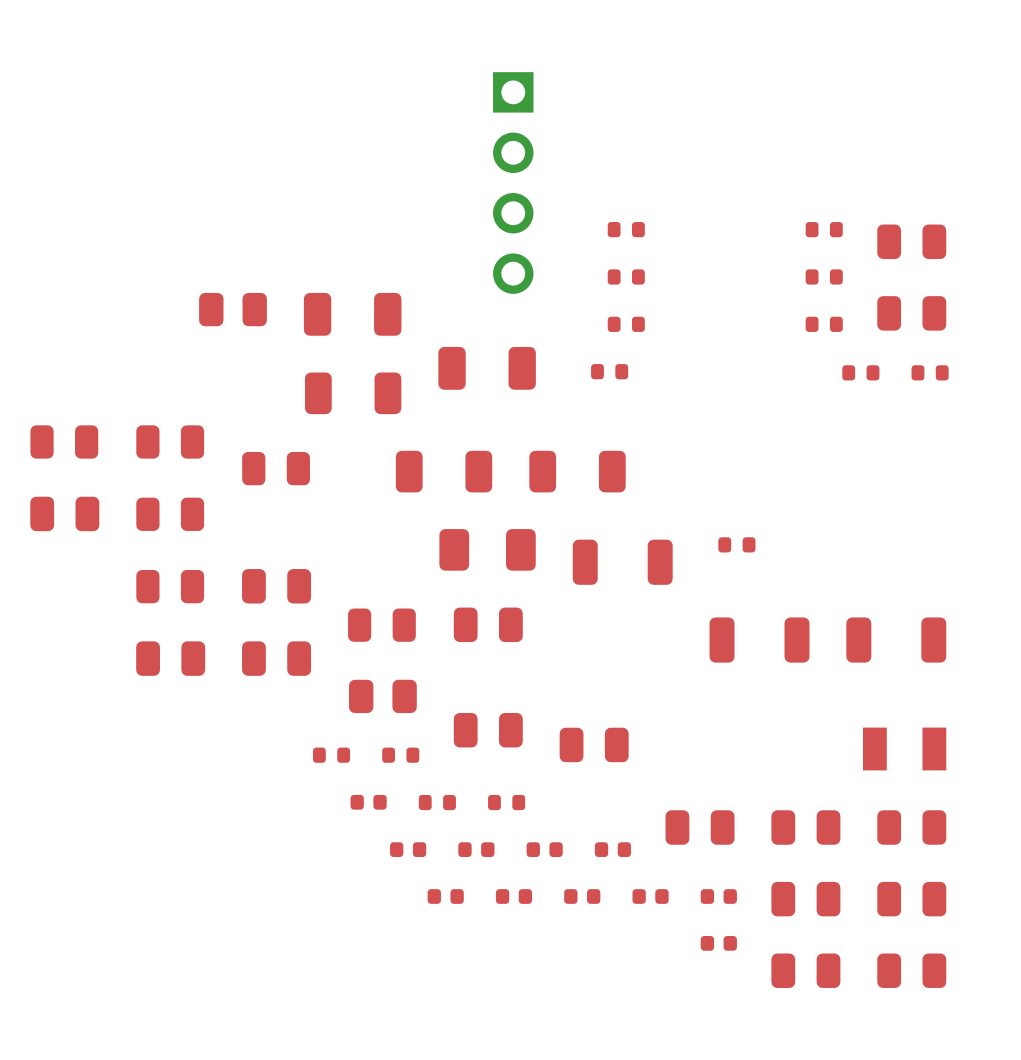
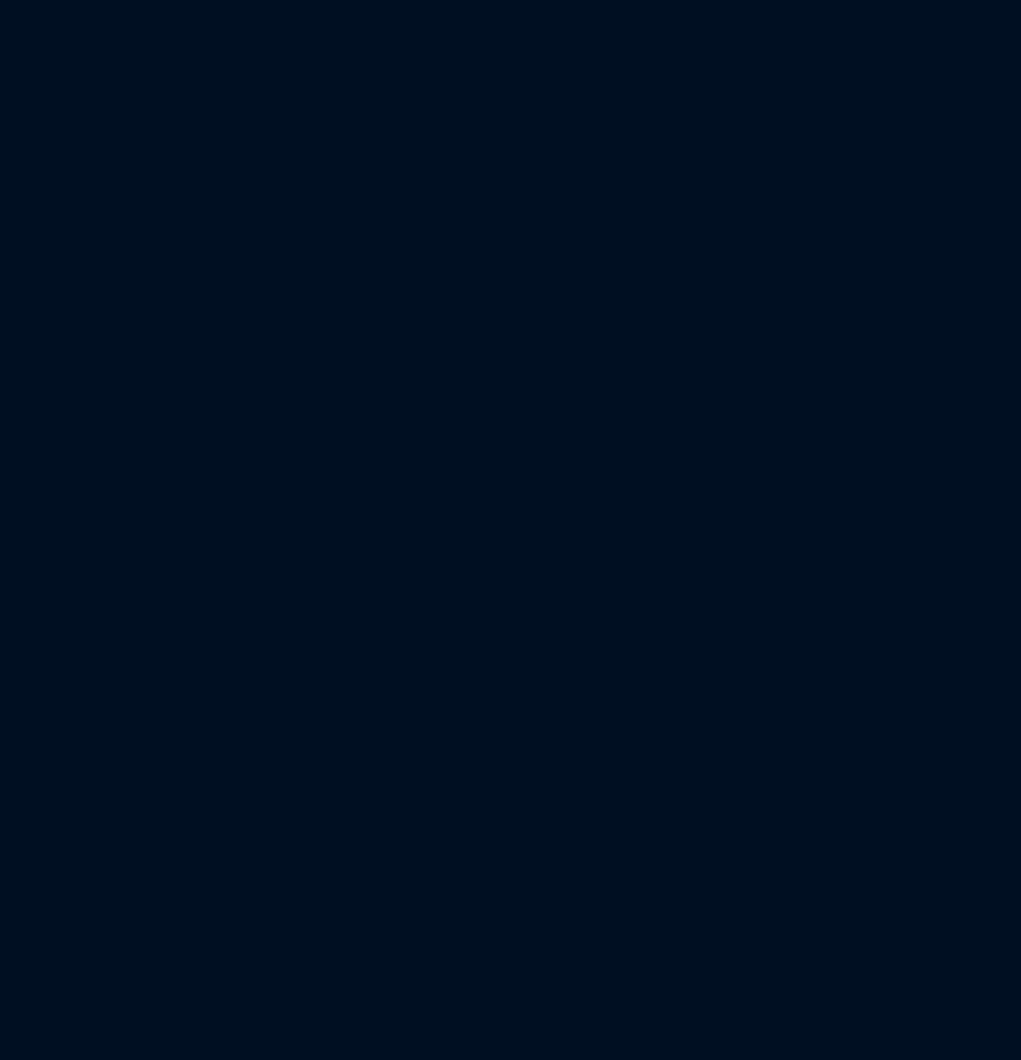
part: (513, 183) -> none
part: (626, 229) -> none
part: (824, 229) -> none
part: (911, 241) -> none
part: (626, 276) -> none
part: (824, 276) -> none
part: (233, 309) -> none
part: (911, 313) -> none
part: (352, 314) -> none
part: (626, 324) -> none
part: (824, 324) -> none
part: (487, 368) -> none
part: (609, 371) -> none
part: (860, 372) -> none
part: (930, 372) -> none
part: (353, 393) -> none
part: (64, 441) -> none
part: (170, 441) -> none
part: (276, 468) -> none
part: (444, 471) -> none
part: (577, 471) -> none
part: (64, 513) -> none
part: (170, 514) -> none
part: (736, 544) -> none
part: (487, 549) -> none
part: (622, 562) -> none
part: (170, 586) -> none
part: (276, 586) -> none
part: (488, 624) -> none
part: (381, 625) -> none
part: (759, 640) -> none
part: (896, 640) -> none
part: (170, 658) -> none
part: (276, 658) -> none
part: (382, 696) -> none
part: (488, 730) -> none
part: (594, 744) -> none
part: (904, 749) -> none
part: (331, 755) -> none
part: (400, 755) -> none
part: (368, 802) -> none
part: (437, 802) -> none
part: (506, 802) -> none
part: (700, 827) -> none
part: (805, 827) -> none
part: (911, 827) -> none
part: (408, 849) -> none
part: (476, 849) -> none
part: (544, 849) -> none
part: (612, 849) -> none
part: (445, 896) -> none
part: (513, 896) -> none
part: (582, 896) -> none
part: (650, 896) -> none
part: (718, 896) -> none
part: (805, 899) -> none
part: (911, 899) -> none
part: (718, 943) -> none
part: (805, 970) -> none
part: (911, 970) -> none

